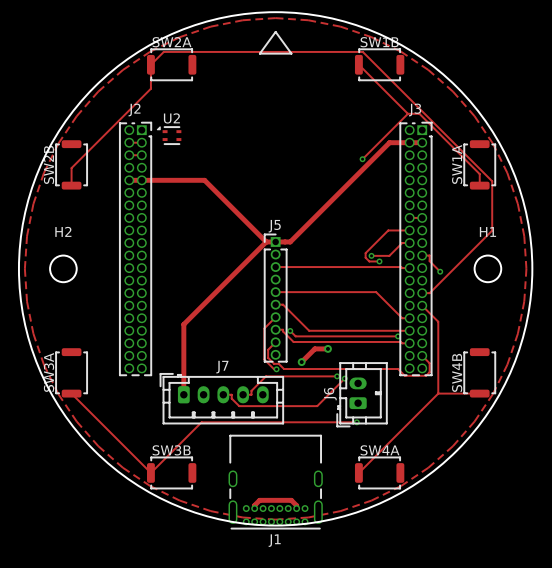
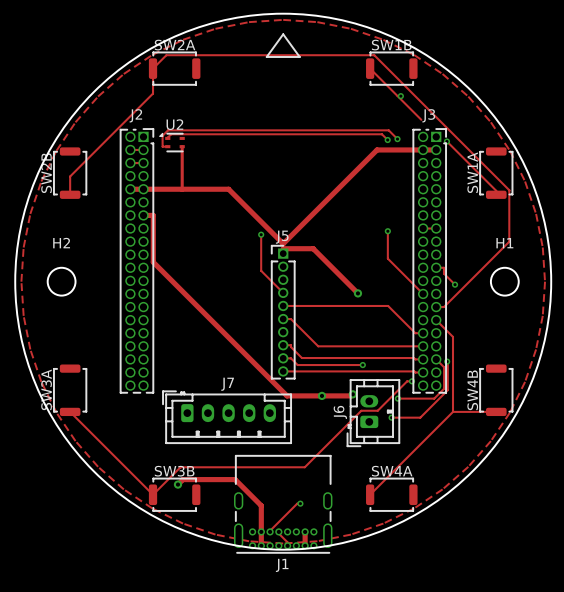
via: none -> (400, 96)
track: none -> (167, 138) (171, 134) (381, 134) (387, 139)
track: none -> (397, 139) (388, 130) (168, 130) (162, 135) (162, 146) (167, 146)
via: none -> (397, 139)
via: none -> (387, 139)
via: none -> (446, 141)
track: none -> (182, 146) (182, 189)
track: (389, 142) (290, 241) (266, 241) -> (402, 149) (377, 149) (283, 243) (228, 189) (209, 189)
track: (362, 159) (407, 113) (419, 113) (479, 174) (479, 181) -> (446, 141) (496, 190)
via: (362, 159) -> none
track: (204, 180) (266, 241) -> none
track: none -> (143, 215) (153, 215) (153, 262) (286, 395) (351, 395) (352, 394)
track: none -> (387, 231) (387, 258) (423, 293)
via: none -> (387, 231)
track: none -> (261, 234) (261, 270) (283, 292)
via: none -> (261, 234)
track: (409, 230) (388, 230) (365, 253) (365, 257) (369, 261) (379, 261) -> none
track: none -> (283, 248) (313, 248) (357, 293)
track: (266, 241) (183, 324) (183, 394) -> none
track: (409, 243) (402, 243) (389, 255) (371, 255) -> none
via: (371, 255) -> none
via: (379, 261) -> none
track: (275, 267) (409, 268) -> (283, 371) (423, 372)
via: none -> (357, 293)
track: (275, 317) (264, 328) (264, 359) (274, 369) (276, 369) -> none
track: (290, 330) (295, 336) (398, 336) -> none
via: (290, 330) -> none
via: (398, 336) -> none
track: (275, 342) (268, 349) (268, 357) (283, 369) (398, 369) (404, 375) (426, 375) (429, 372) (429, 363) (422, 355) -> (283, 358) (290, 358) (297, 365) (362, 365)
track: none -> (436, 359) (444, 367) (444, 388) (434, 398) (397, 398)
track: none -> (447, 361) (447, 390) (420, 417) (391, 417)
via: none -> (447, 361)
track: (327, 348) (314, 348) (301, 362) -> none
via: (327, 348) -> none
via: none -> (362, 365)
via: (301, 362) -> none
via: none -> (411, 381)
via: (276, 369) -> none
track: (337, 376) (265, 376) (251, 390) (251, 394) (243, 394) -> none
via: (337, 376) -> none
via: none -> (352, 394)
via: none -> (321, 395)
track: (344, 378) (317, 406) (239, 406) (231, 398) (231, 394) (223, 394) -> none
via: (344, 378) -> none
via: none -> (397, 398)
via: none -> (391, 417)
track: (356, 422) (201, 422) (177, 446) -> (411, 381) (407, 381) (377, 410) (361, 410) (304, 467) (180, 467)
via: (356, 422) -> none
track: none -> (177, 484) (182, 479) (235, 479) (261, 505) (261, 528)
via: none -> (177, 484)
track: none -> (300, 503) (297, 503) (270, 531)
via: none -> (300, 503)
track: (254, 505) (259, 500) (291, 500) (296, 505) (296, 508) -> (305, 545) (305, 531)
track: none -> (261, 531) (261, 545)
track: none -> (278, 531) (287, 542) (287, 545)

